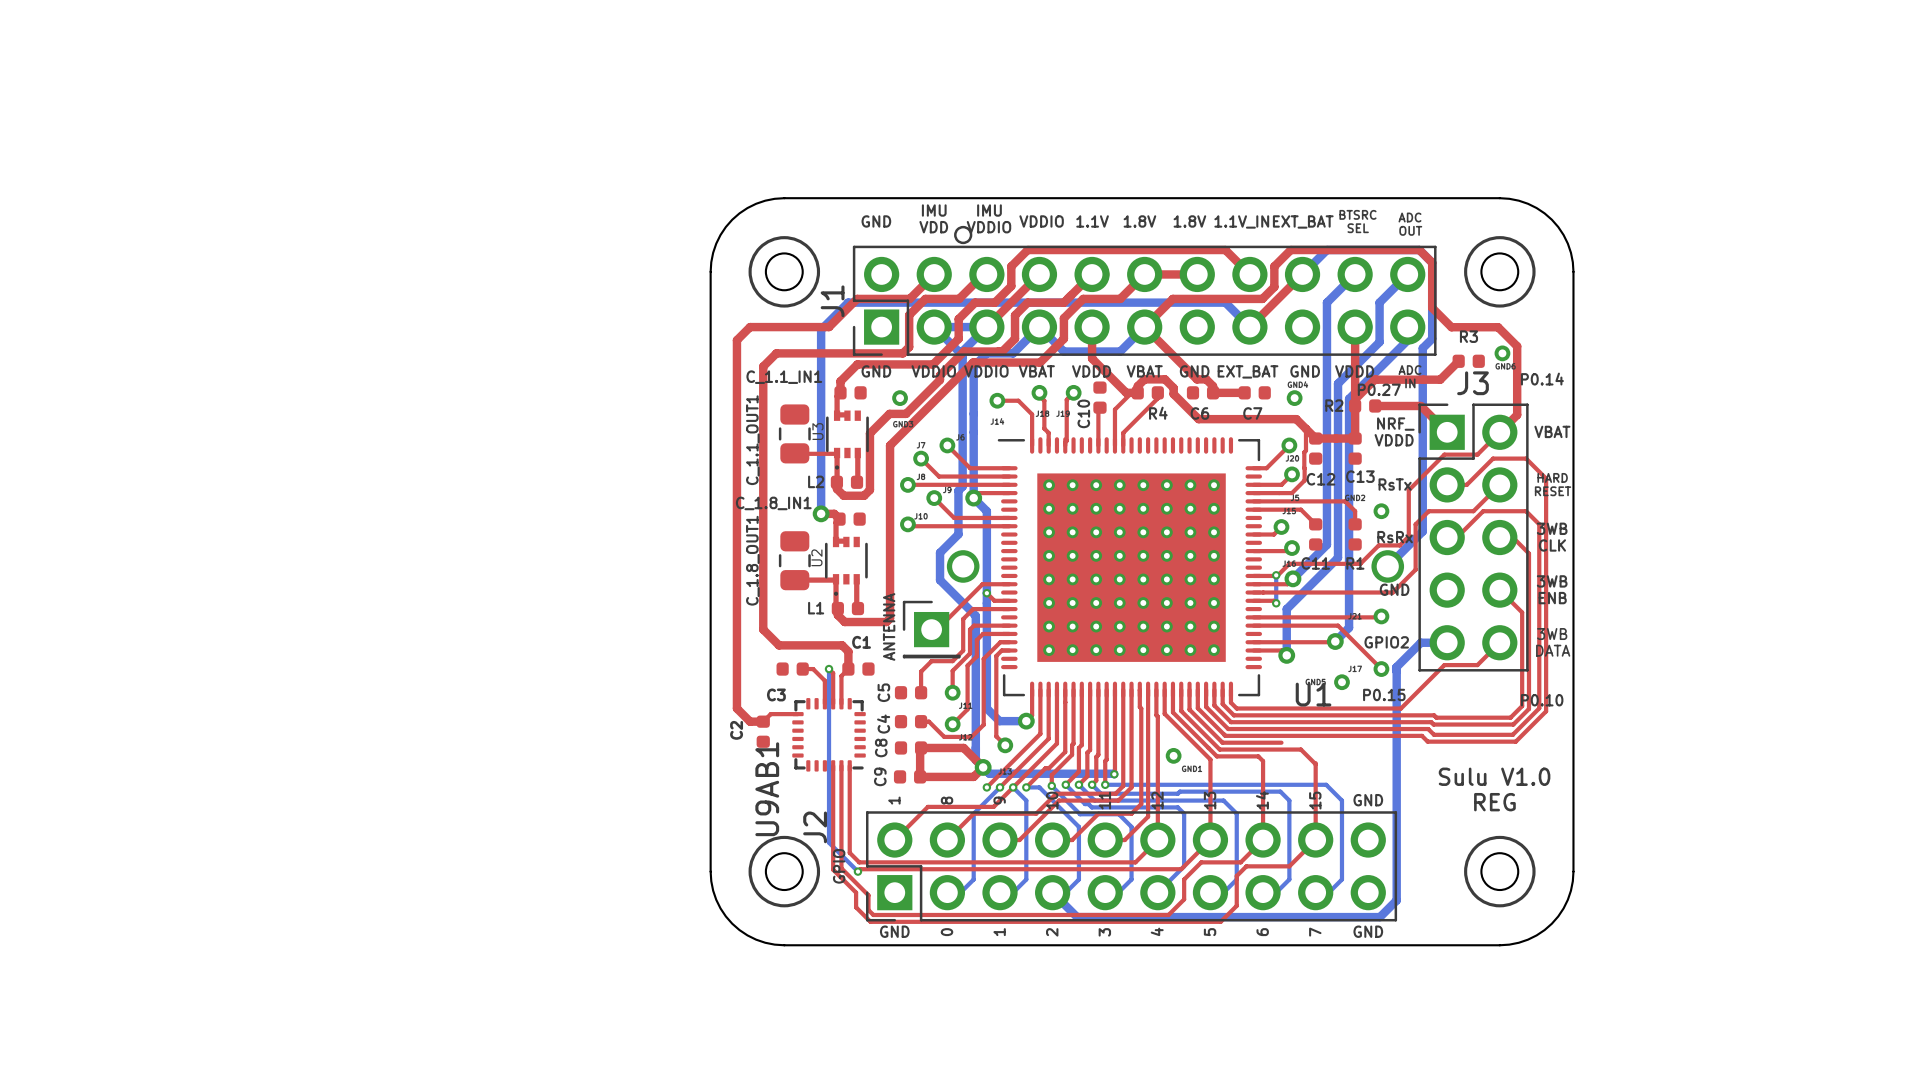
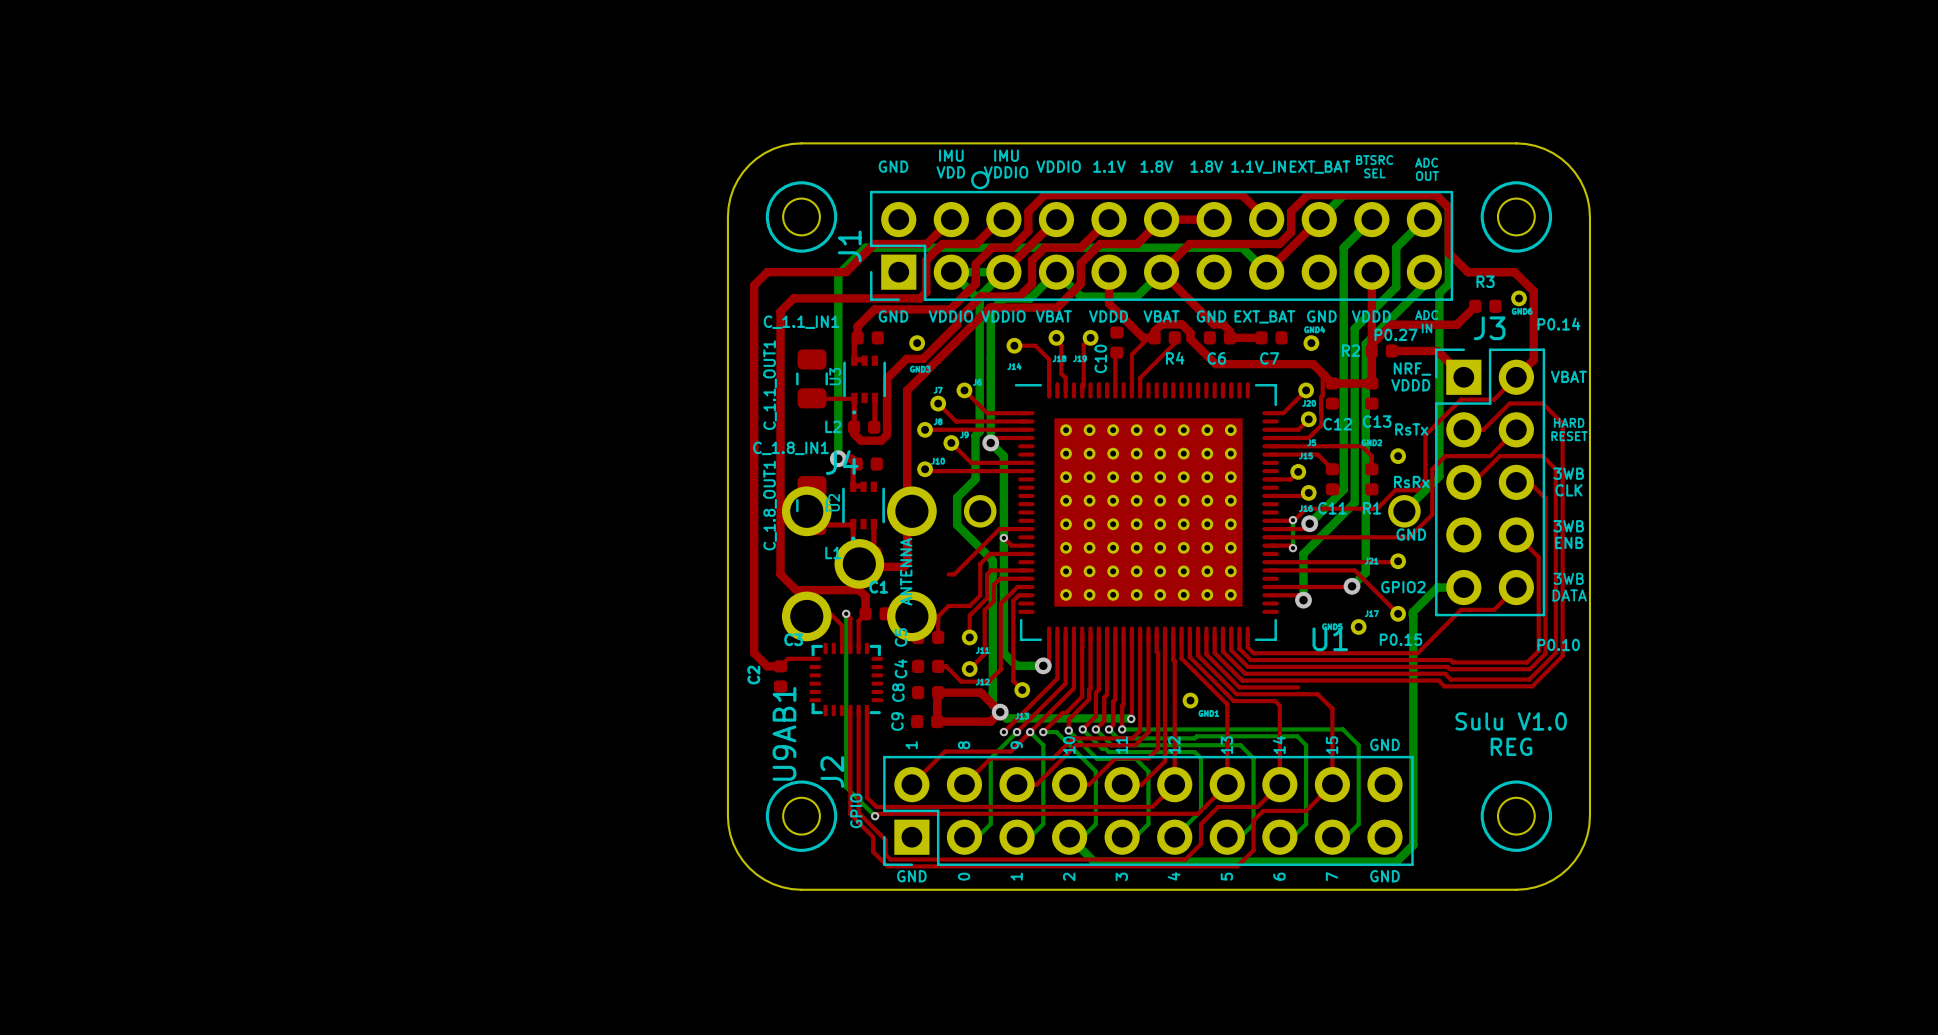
J4: none -> (859, 563)
part: (931, 629) -> none

